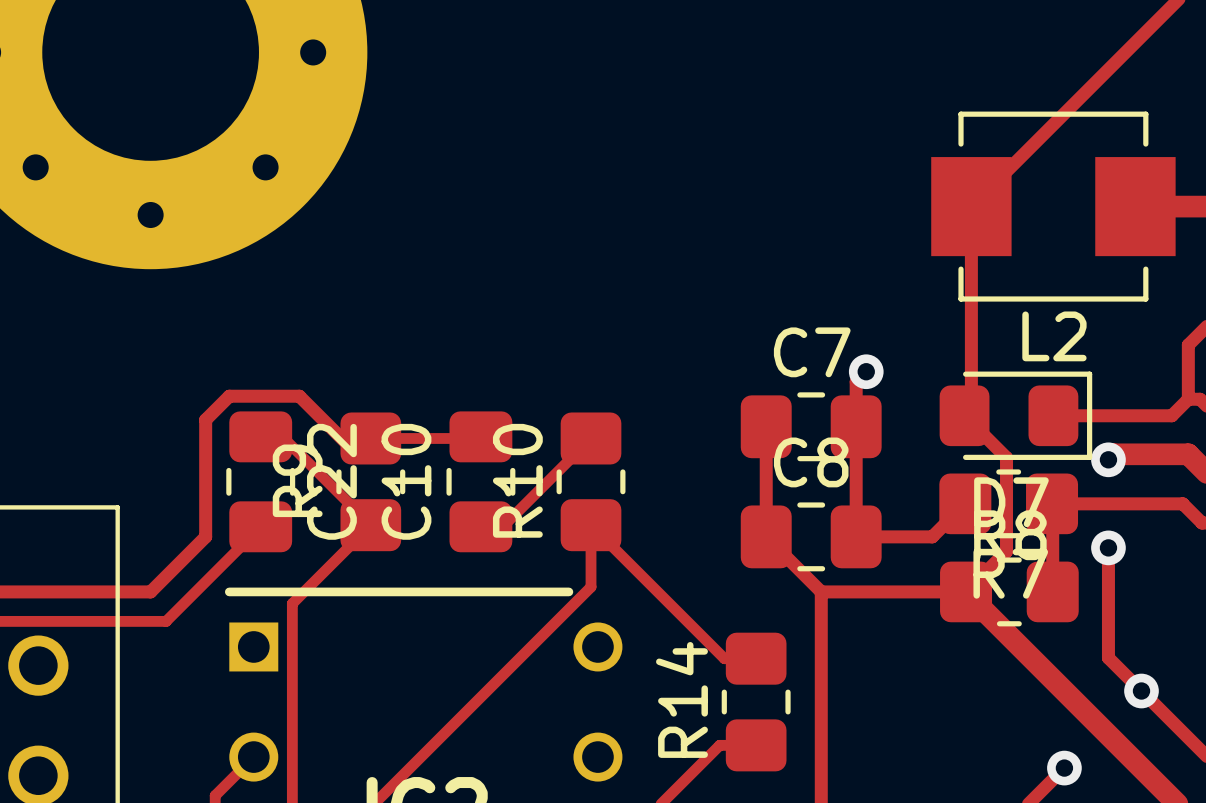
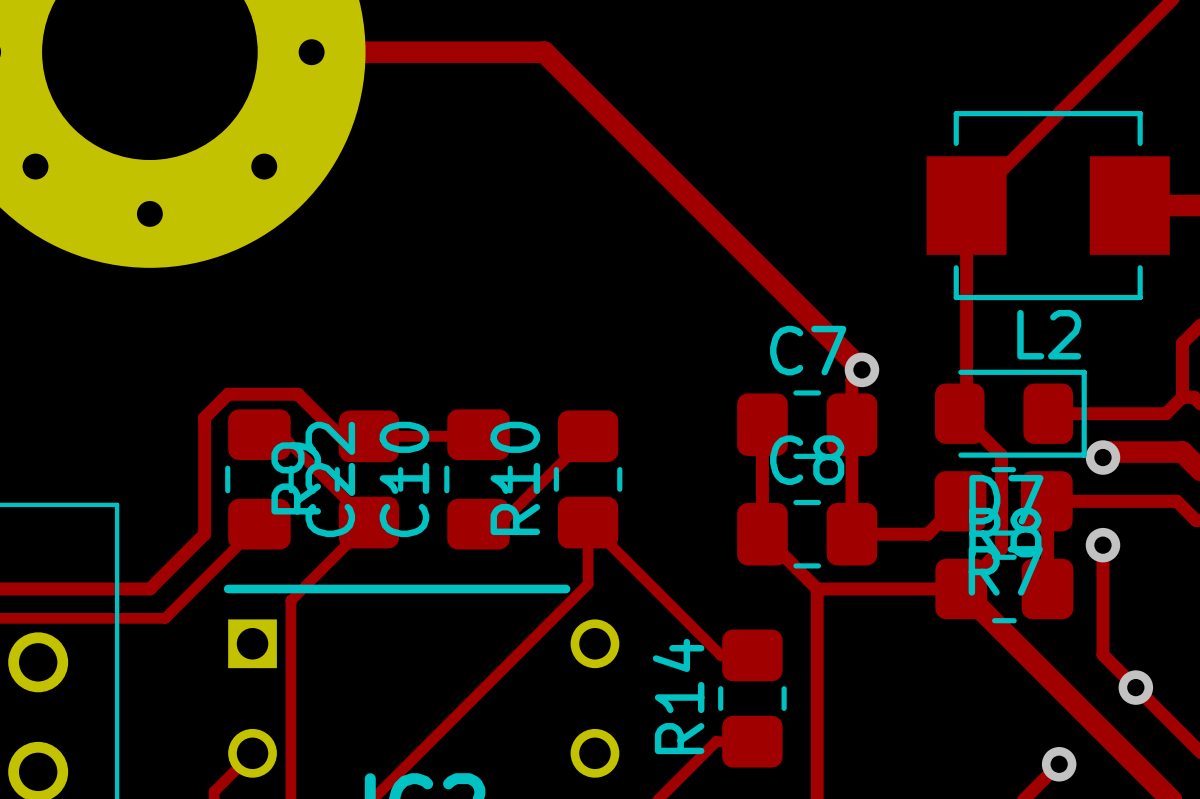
track: none -> (149, 52) (544, 52) (861, 369)

